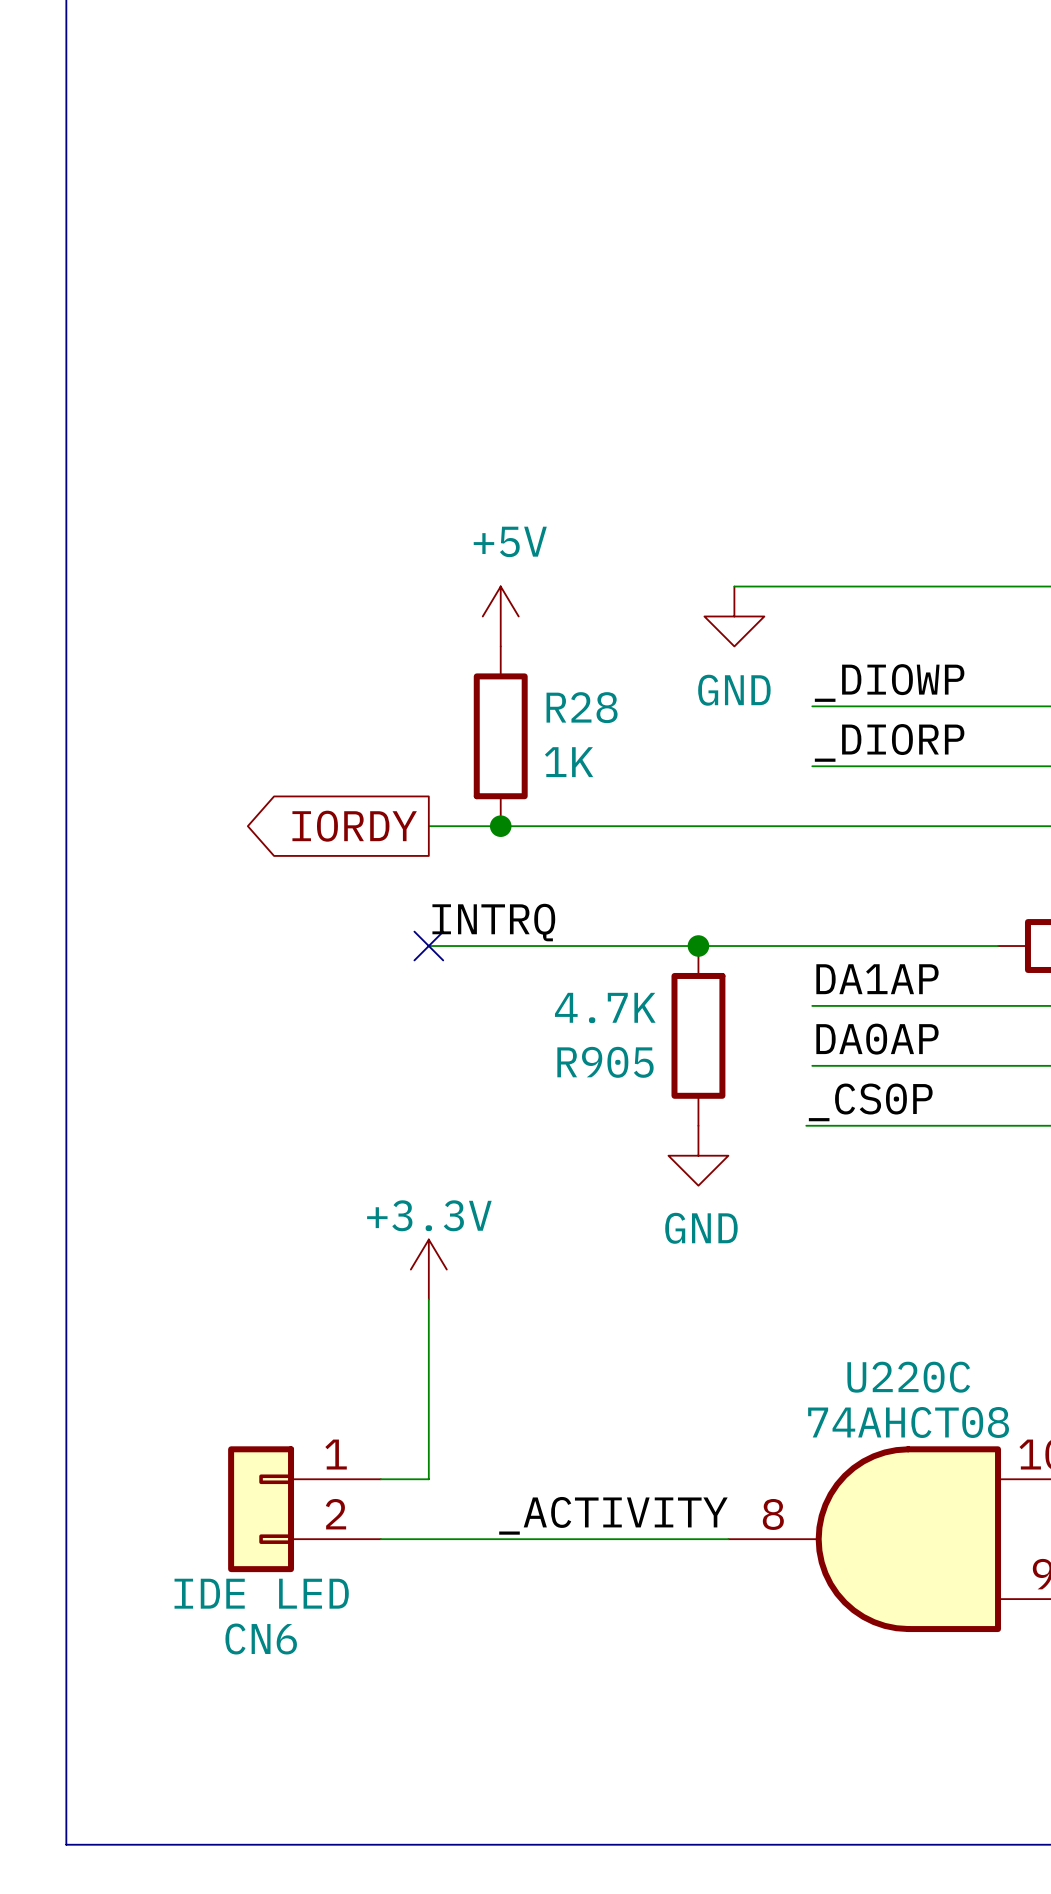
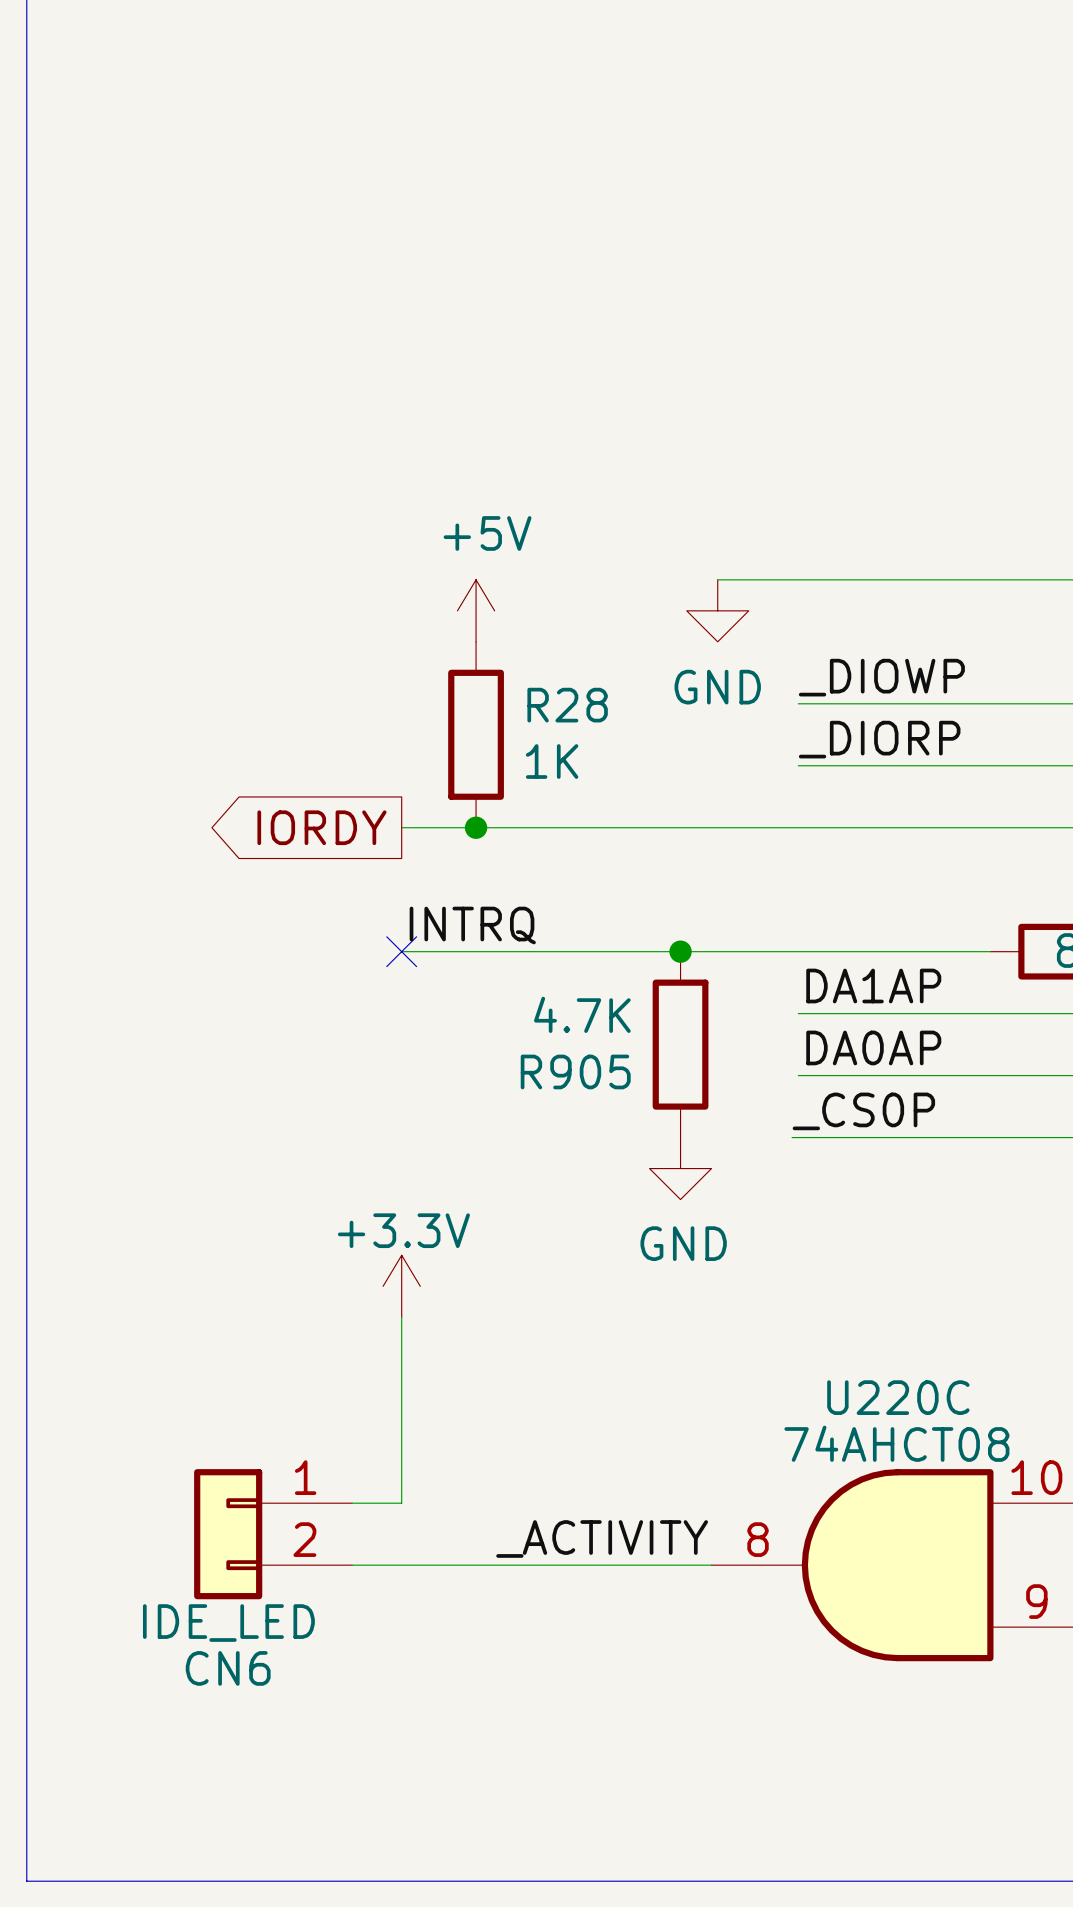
CN6 value: IDE LED (261, 1593) -> IDE_LED (228, 1623)

